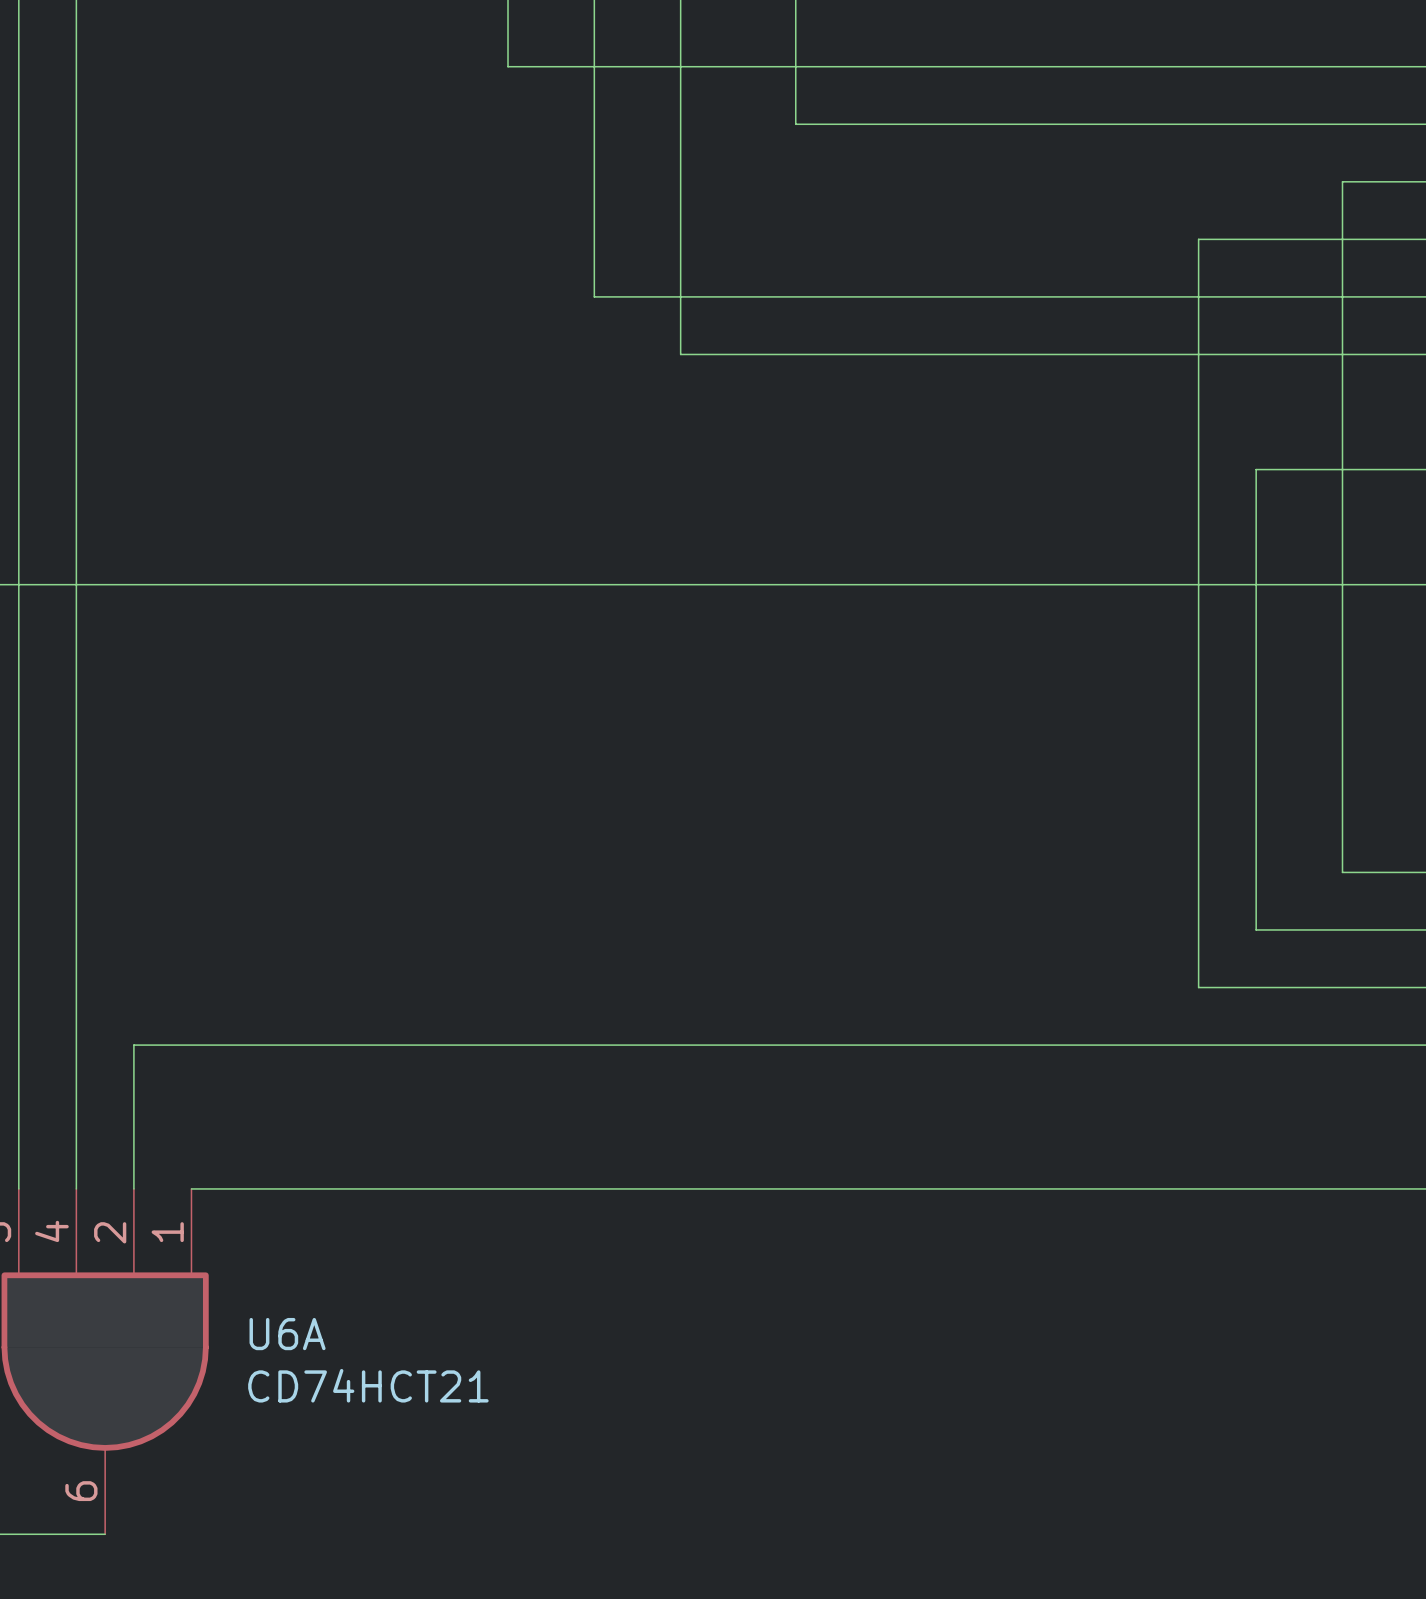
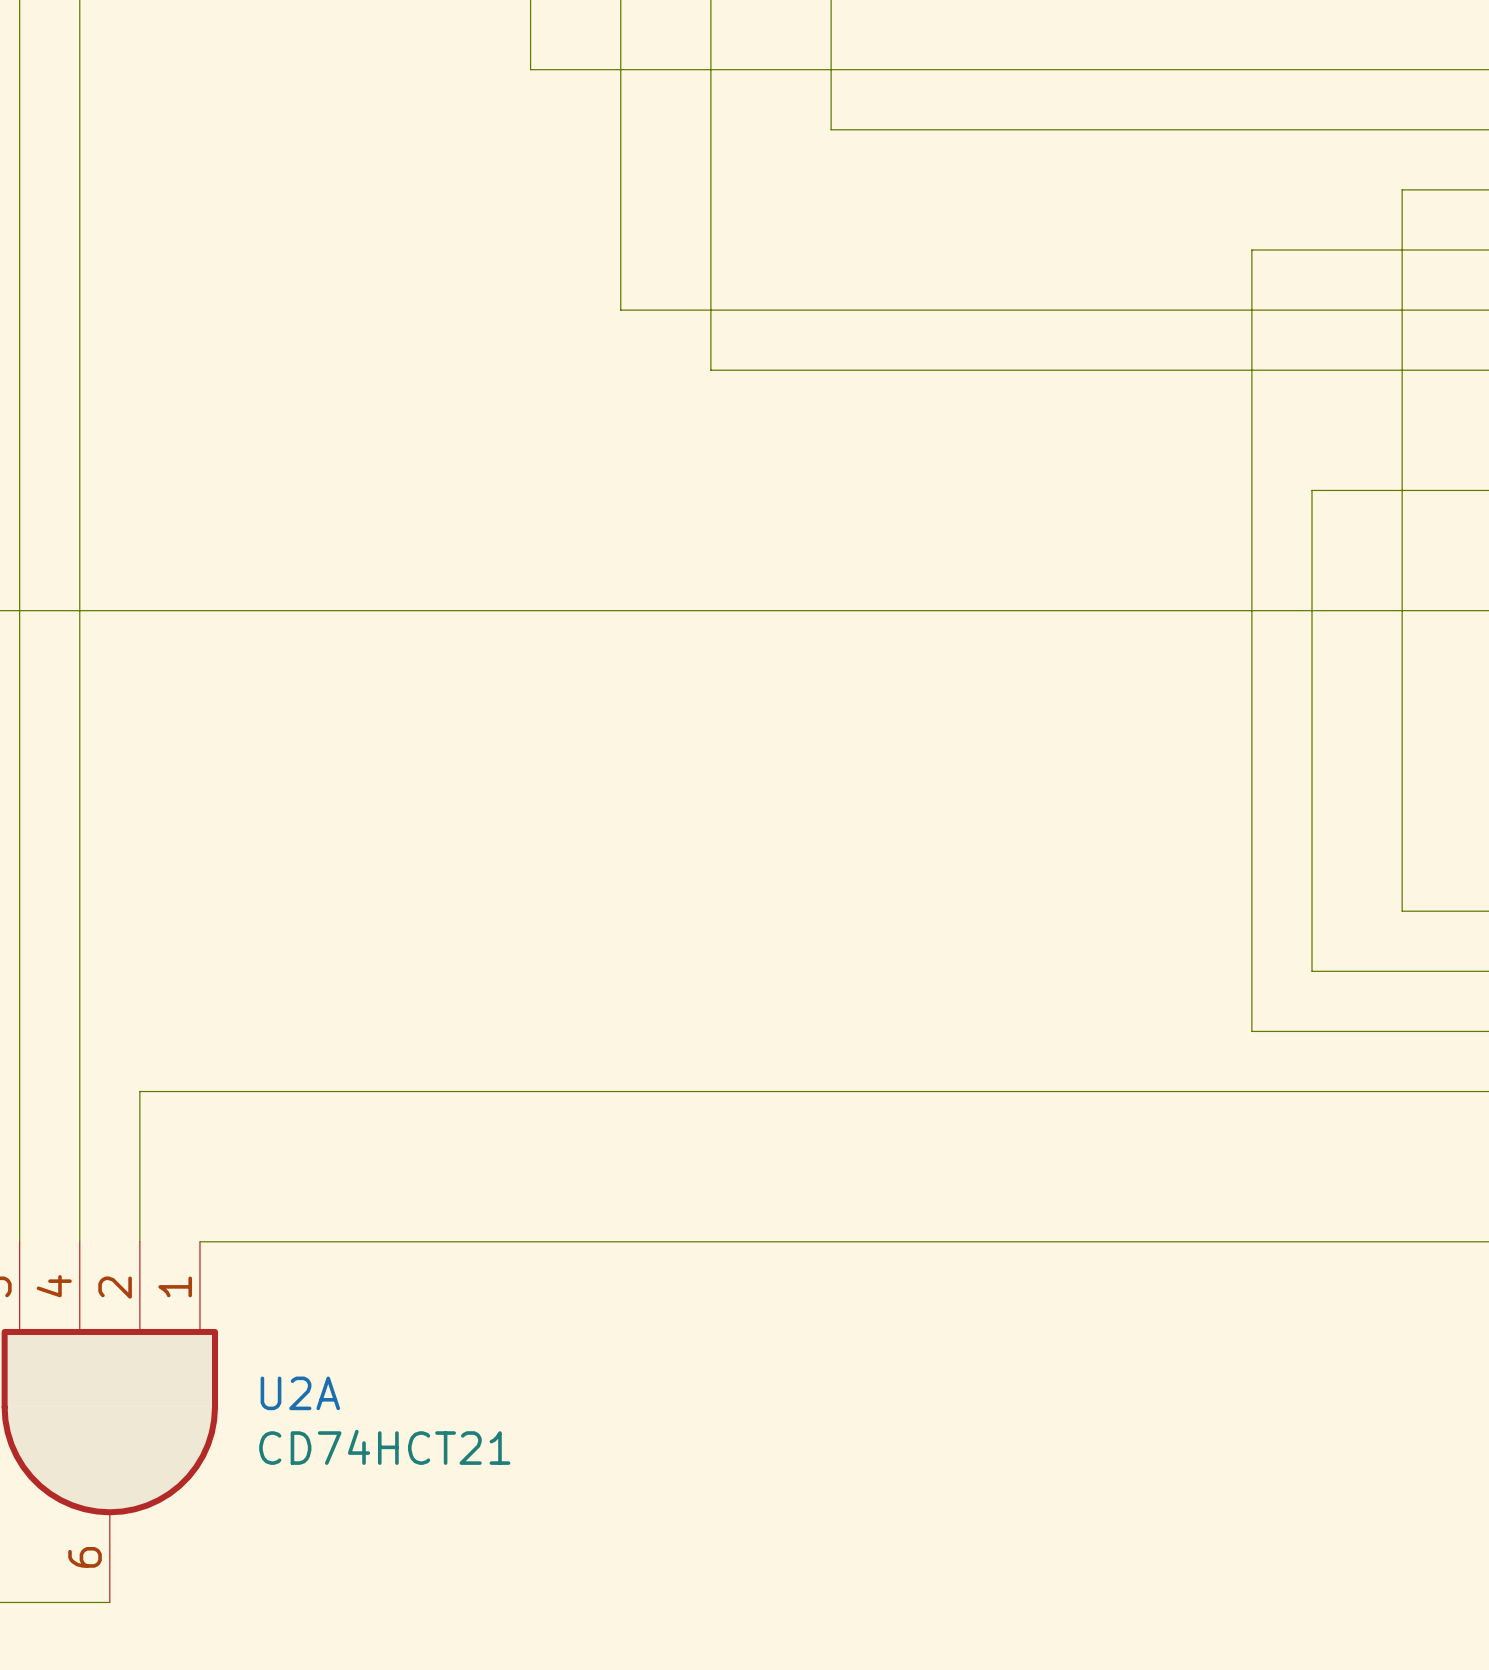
U6A name: U6A (287, 1334) -> U2A (300, 1393)

